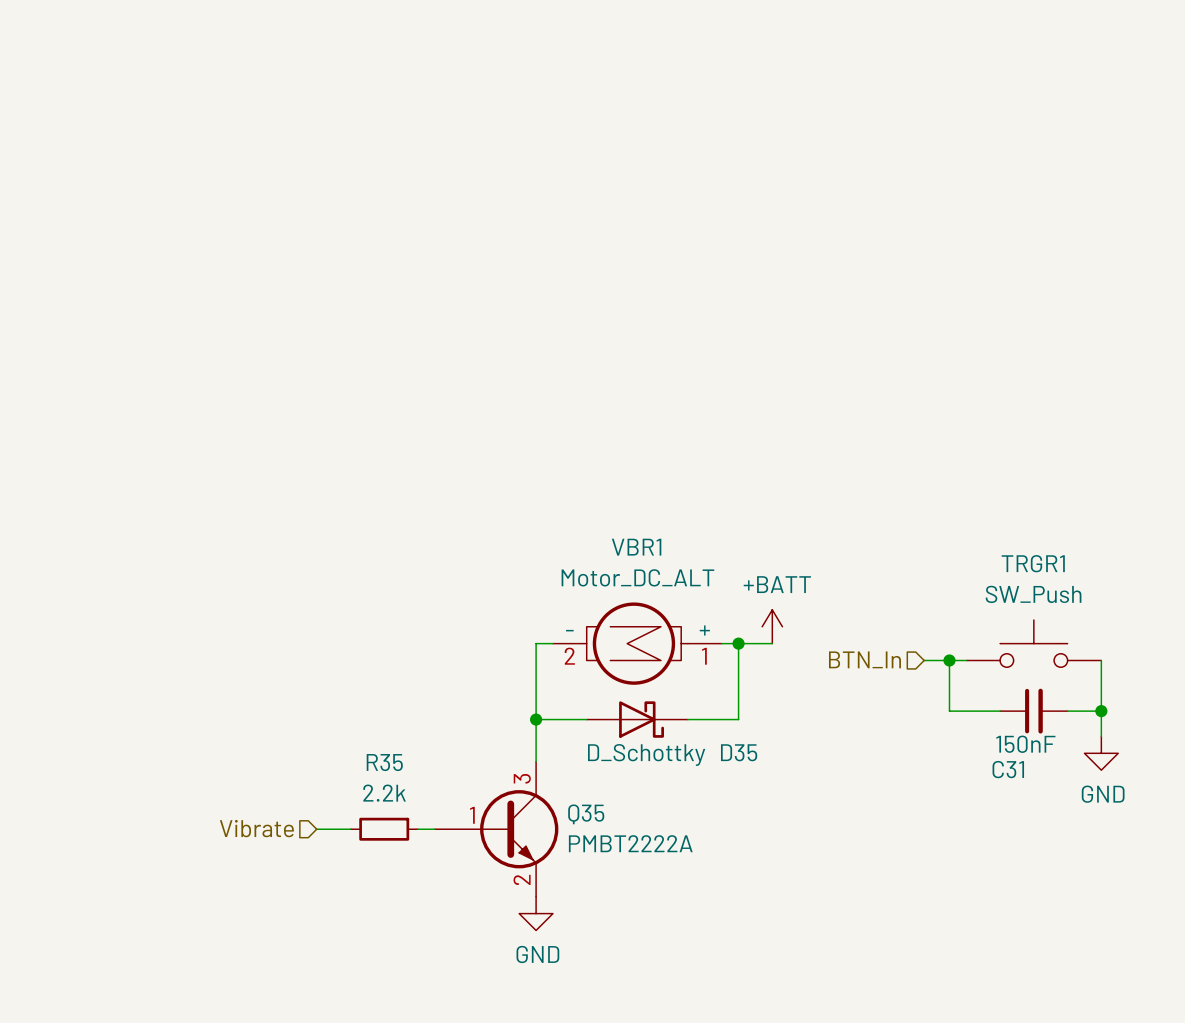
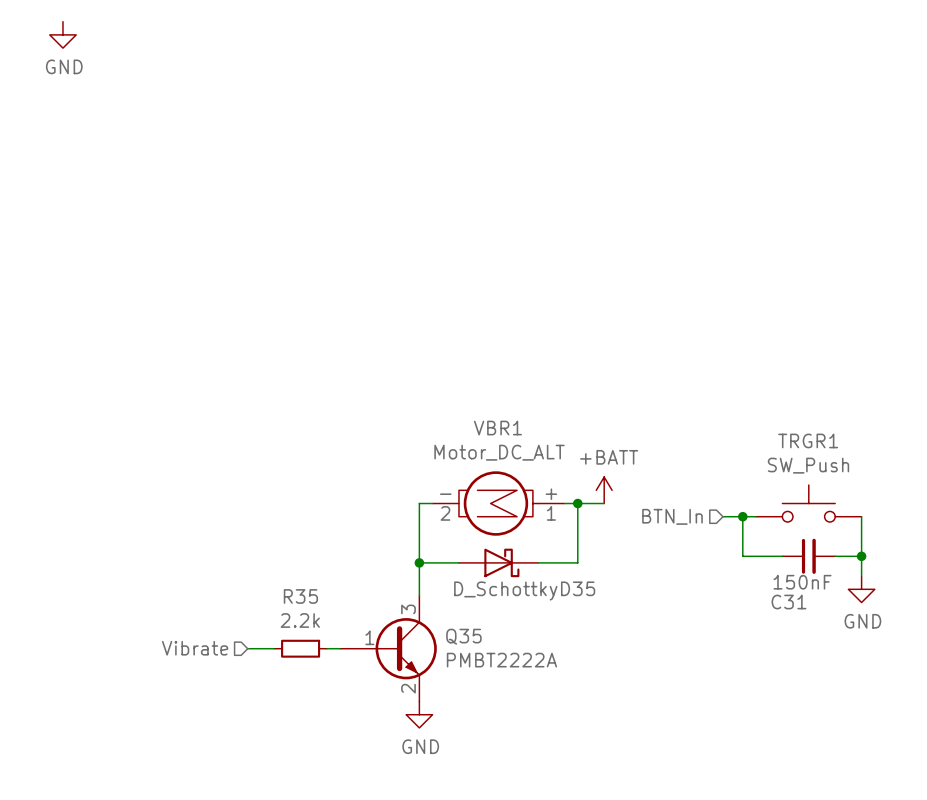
power symbol: none -> GND (62, 34)

